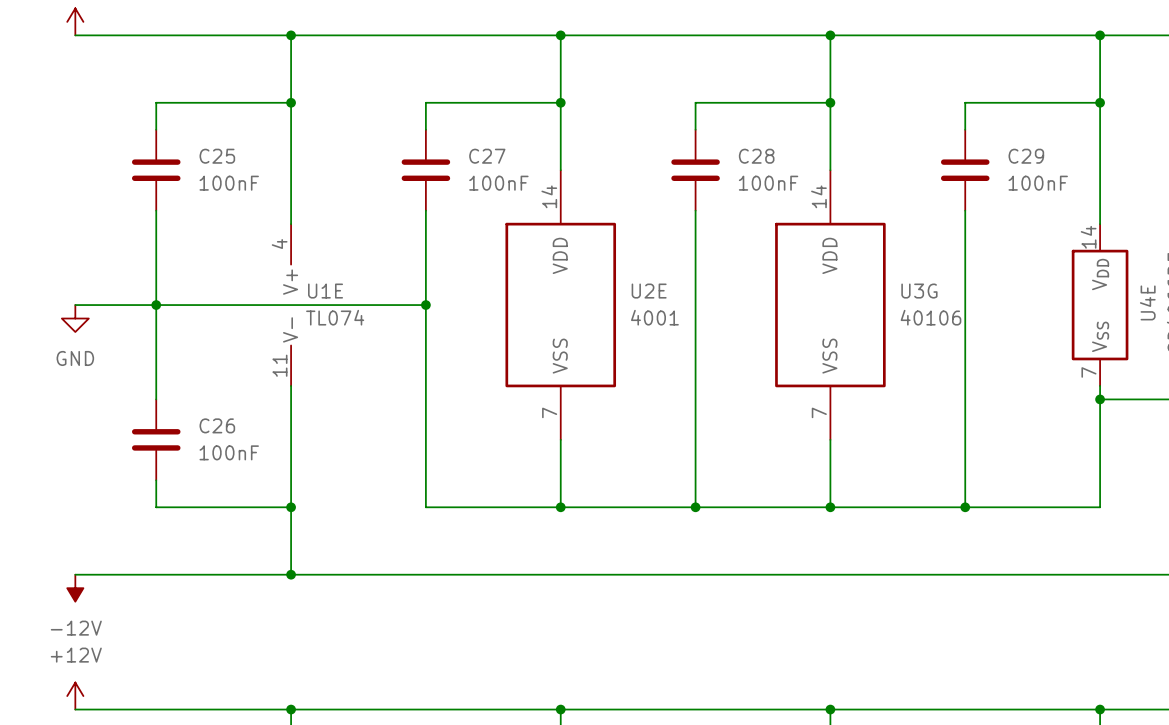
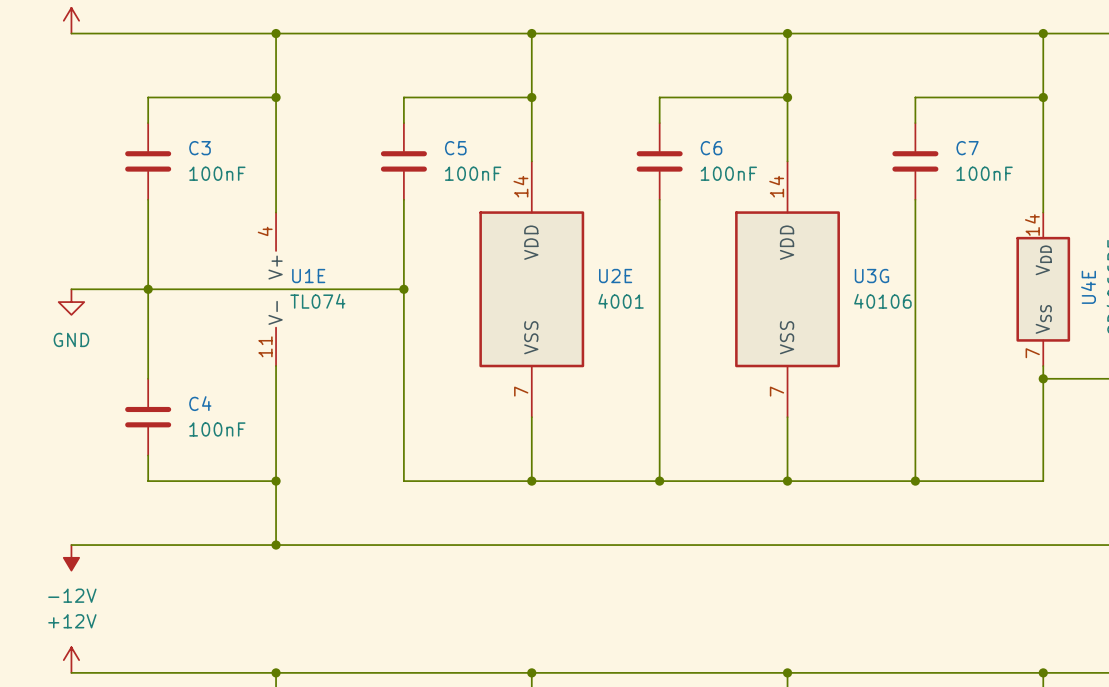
C25 name: C25 (217, 156) -> C3 (200, 148)
C27 name: C27 (487, 156) -> C5 (455, 148)
C28 name: C28 (756, 156) -> C6 (711, 148)
C29 name: C29 (1026, 156) -> C7 (967, 148)
C26 name: C26 (217, 425) -> C4 (200, 403)

